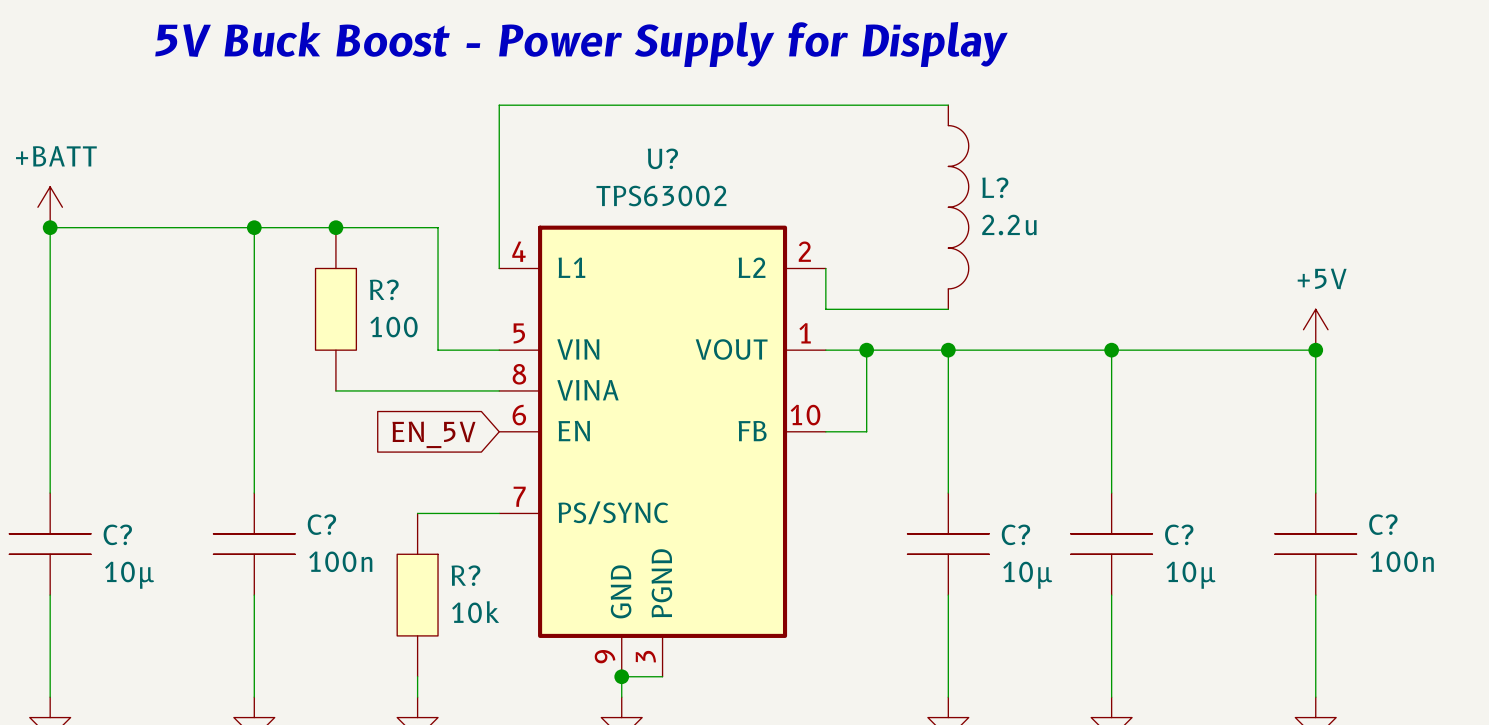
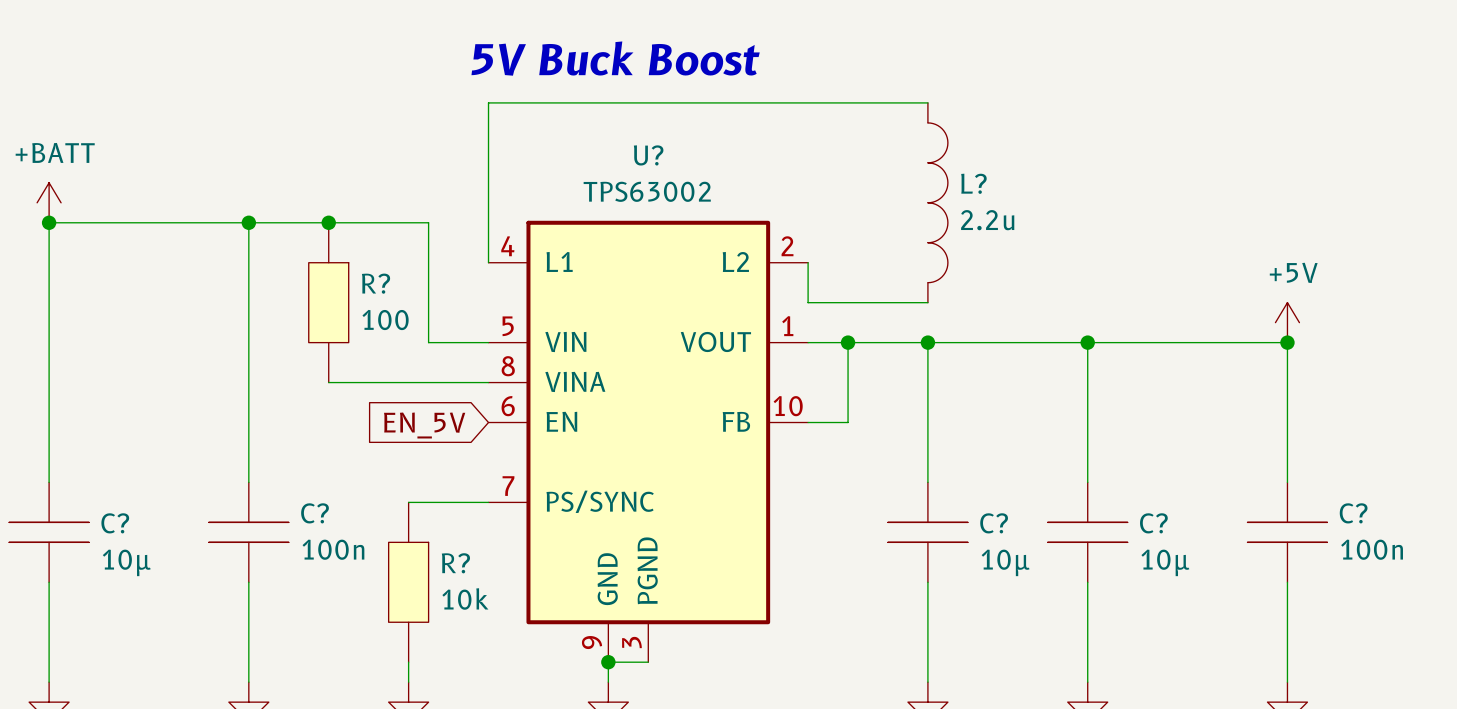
text: 5V Buck Boost - Power Supply for Display (581, 44) -> none
text: none -> 5V Buck Boost (615, 58)

